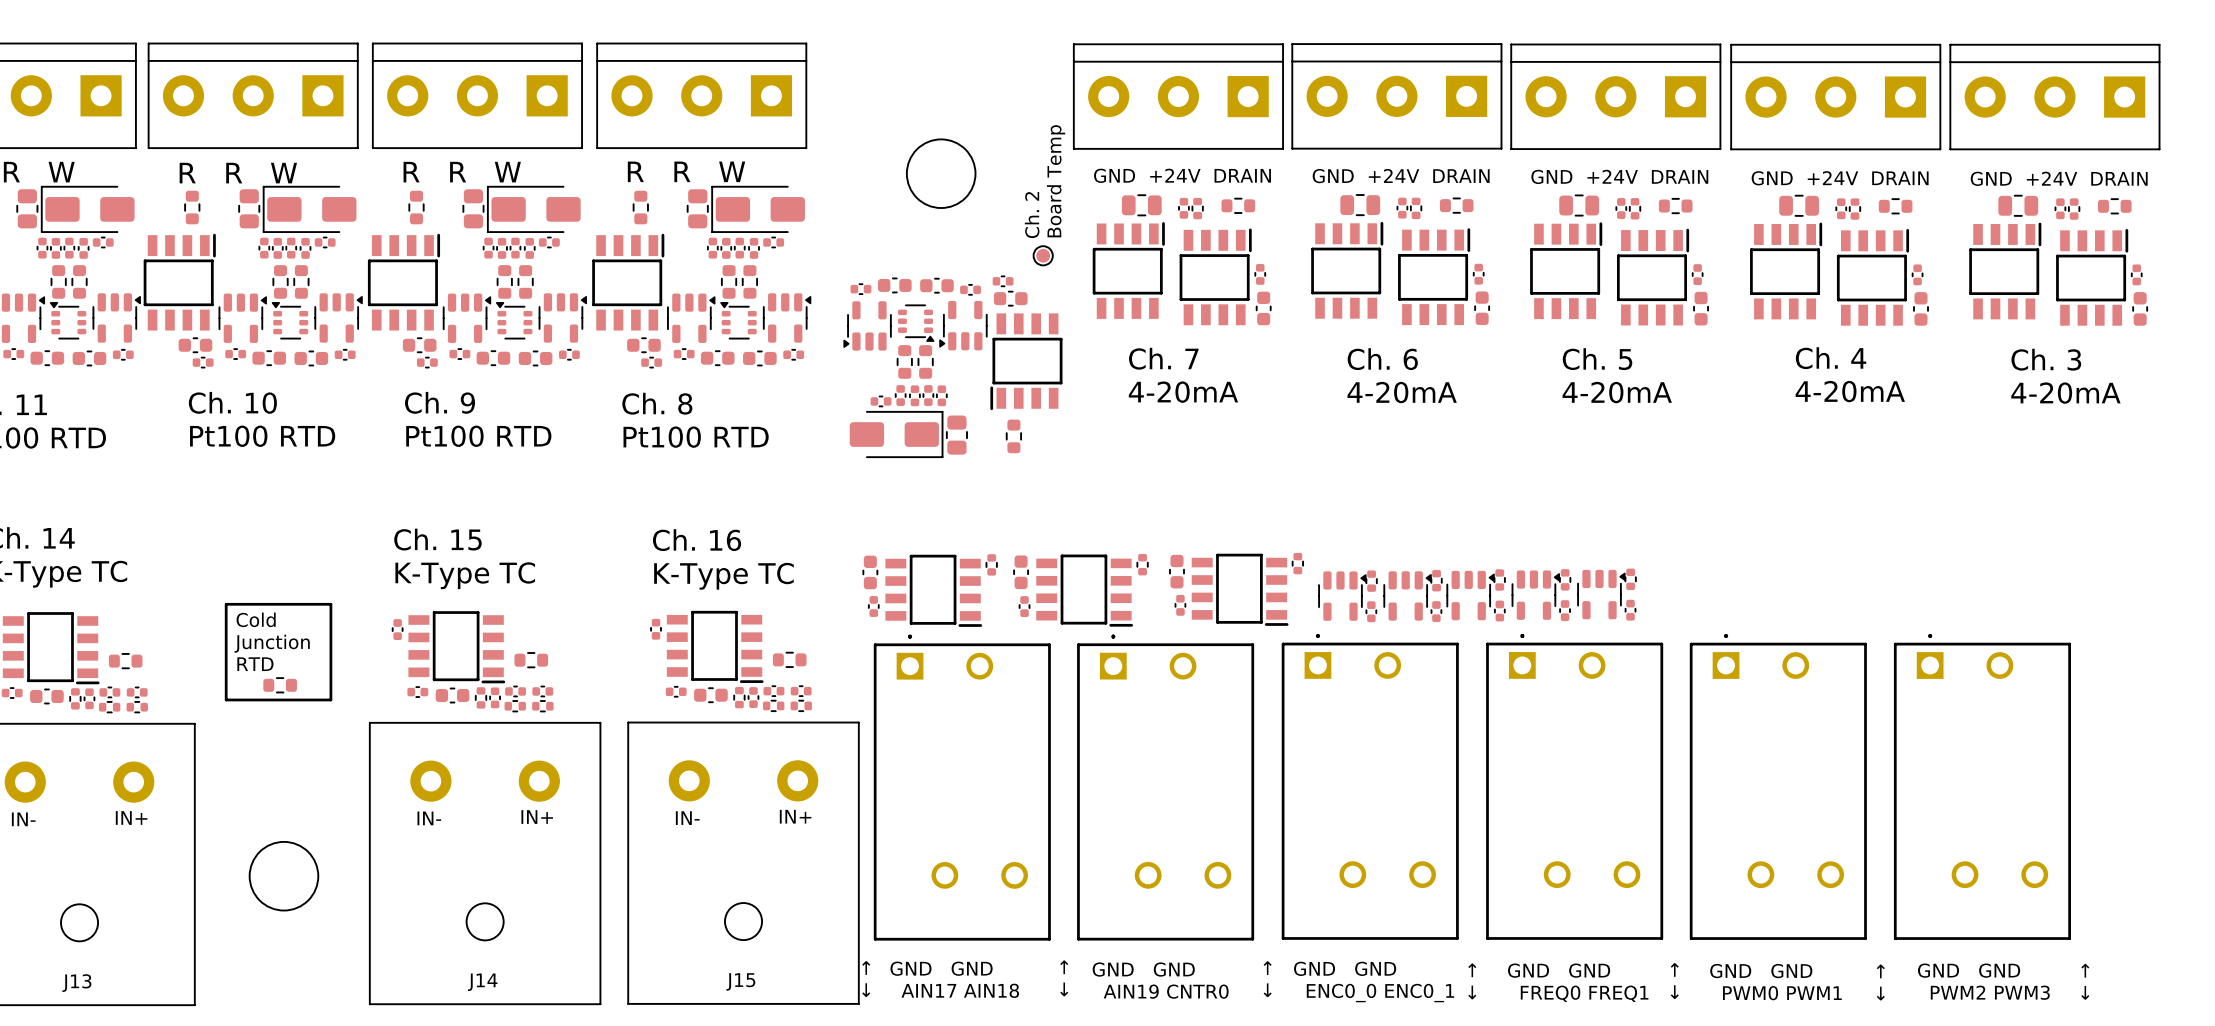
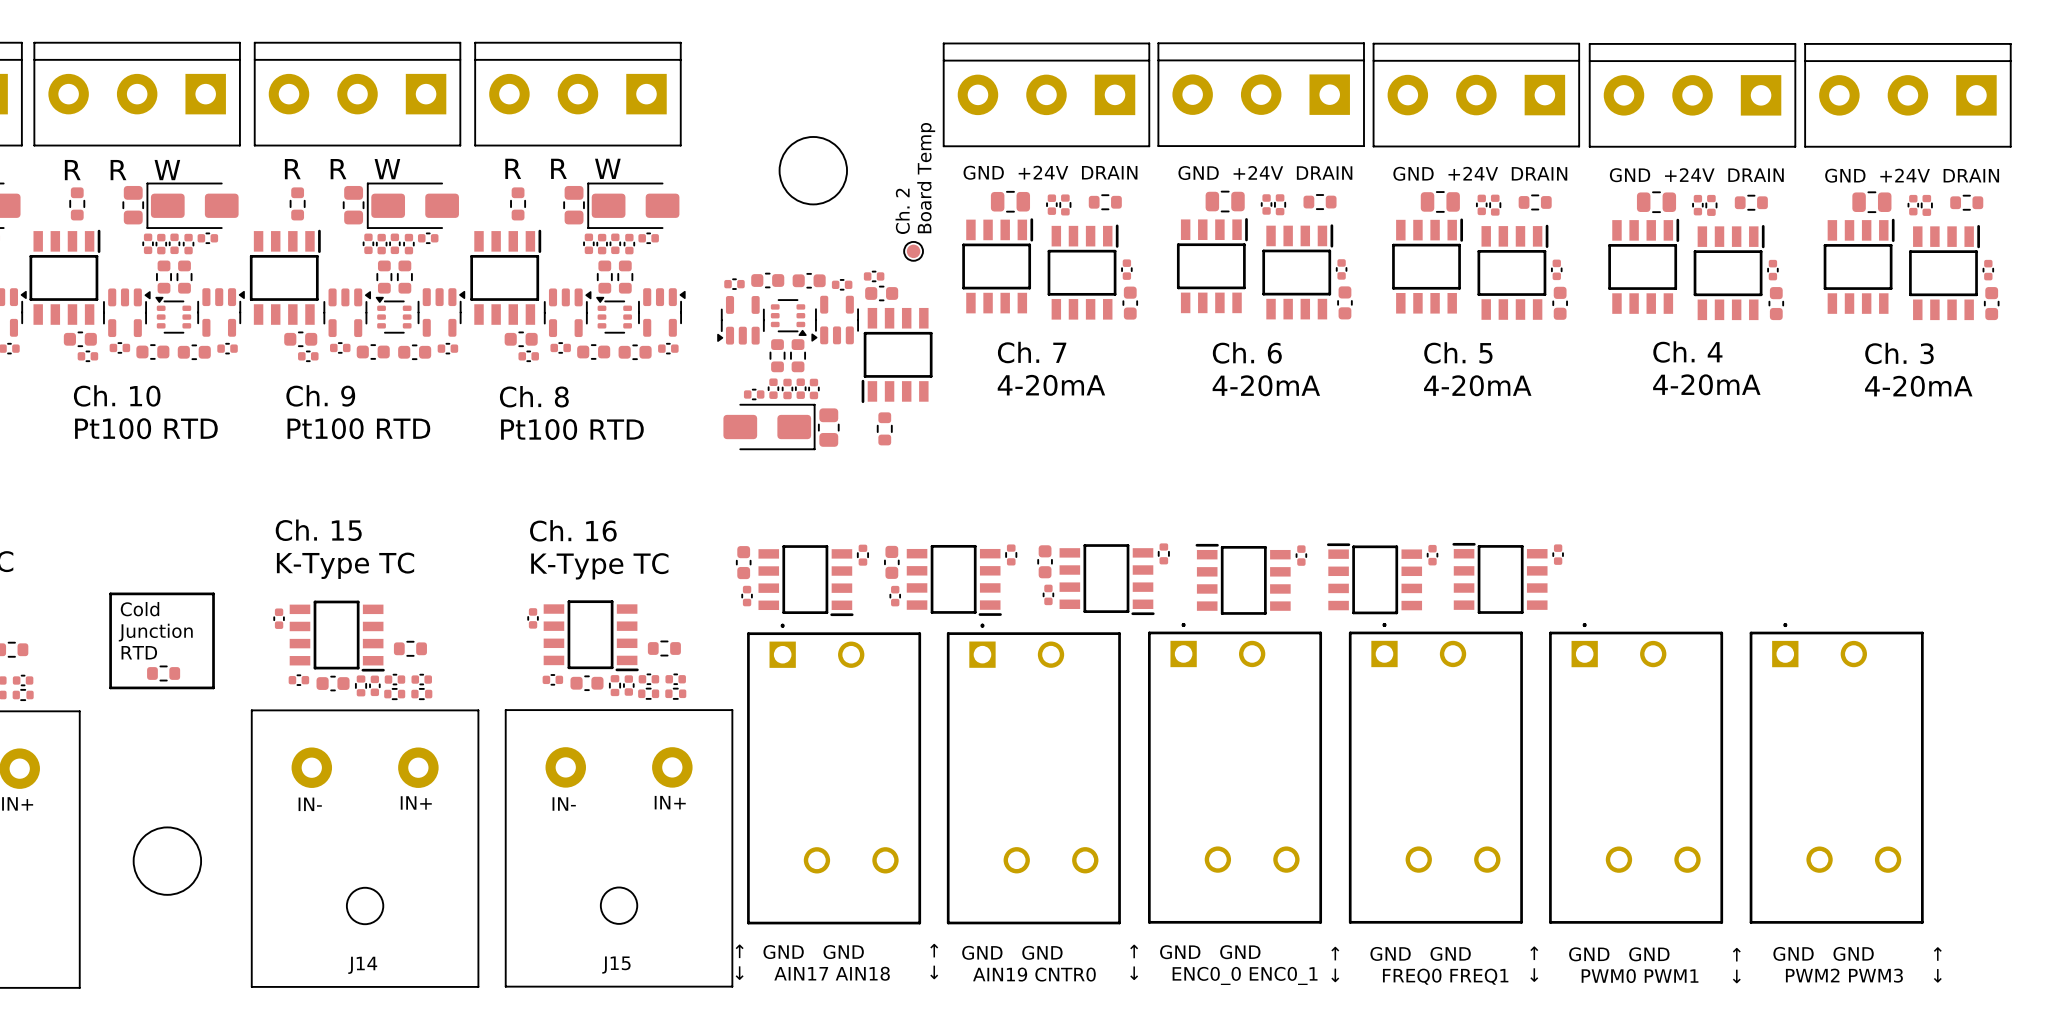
part: none -> (1432, 555)
part: none -> (1558, 554)
part: none -> (1301, 555)
part footprint: [1365, 570, 1378, 592] -> [1195, 543, 1291, 615]
part: (1565, 579) -> none
part: (1630, 579) -> none
part: (1436, 580) -> none
part: (1499, 580) -> none
part: none -> (1374, 578)
part: none -> (1499, 578)
part: (1601, 594) -> none
part: (1407, 595) -> none
part: (1470, 595) -> none
part: (1535, 595) -> none
part: (1342, 596) -> none
part: (1565, 610) -> none
part: (1630, 610) -> none
part: (1371, 611) -> none
part: (1436, 611) -> none
part: (1499, 611) -> none

